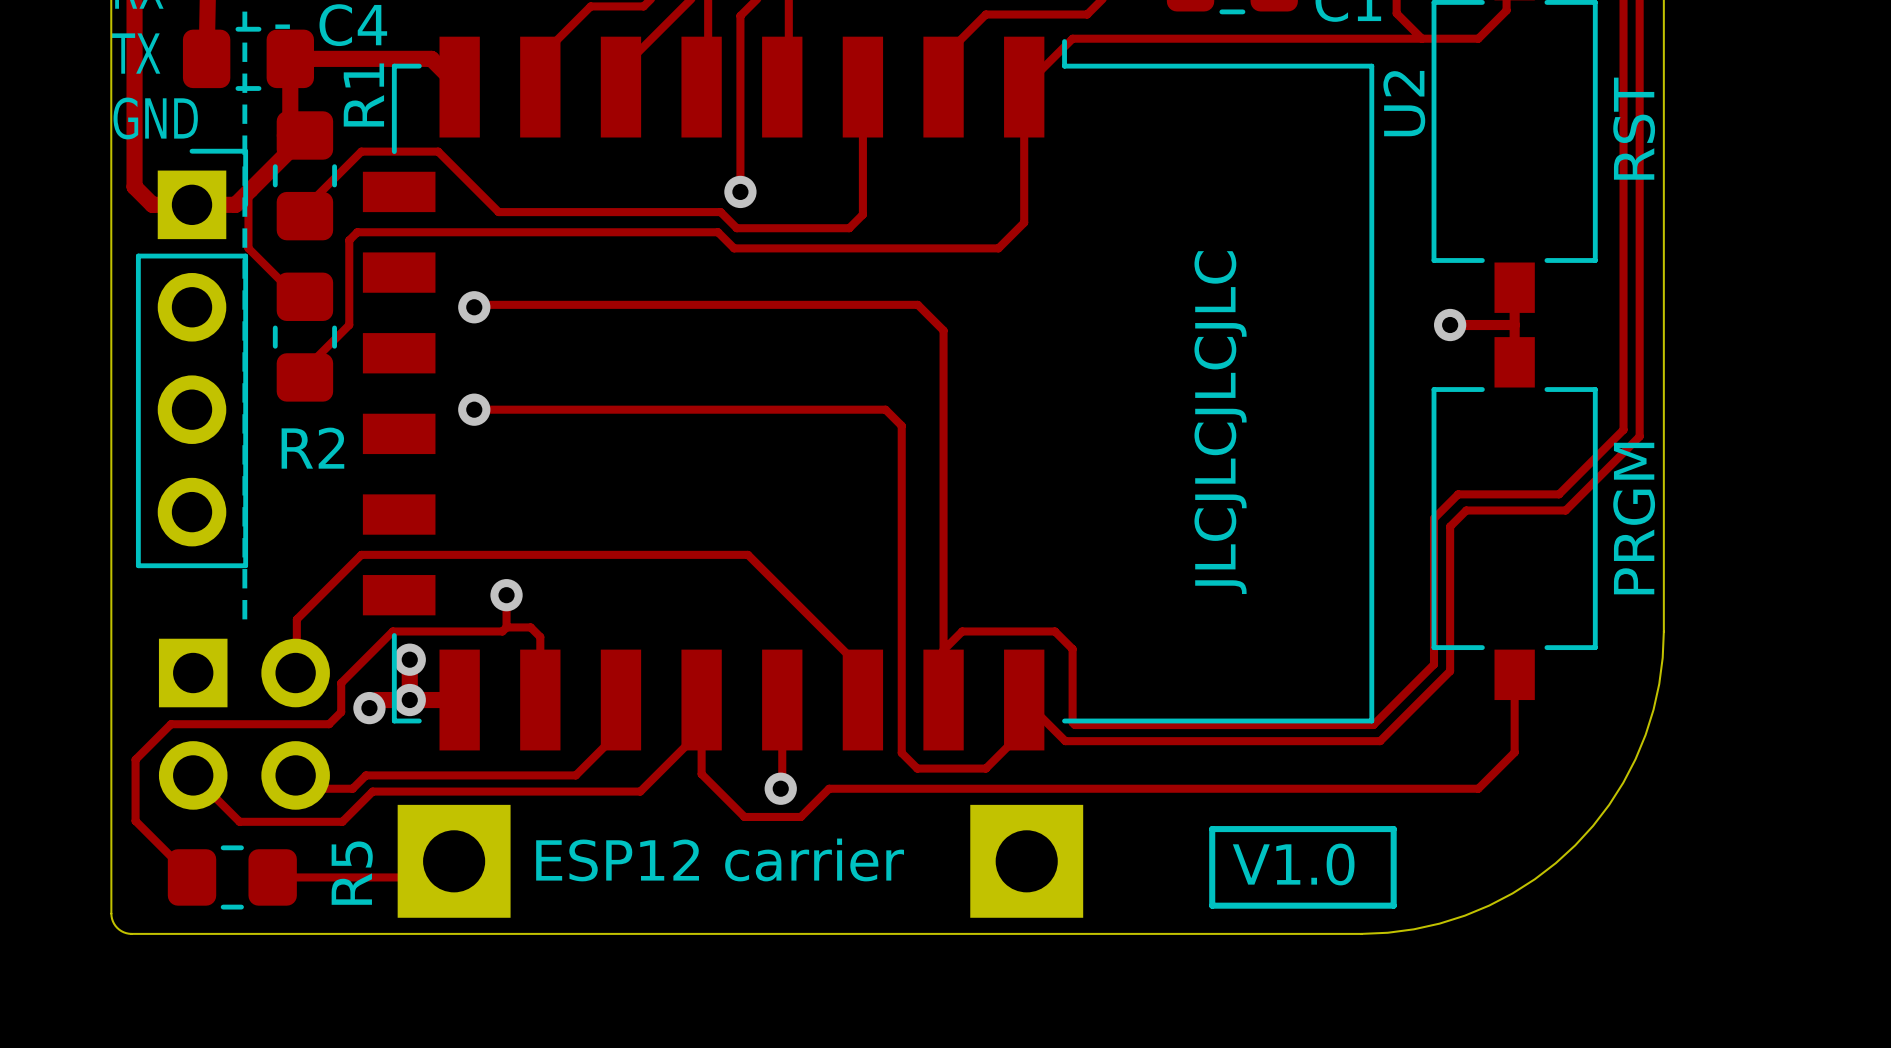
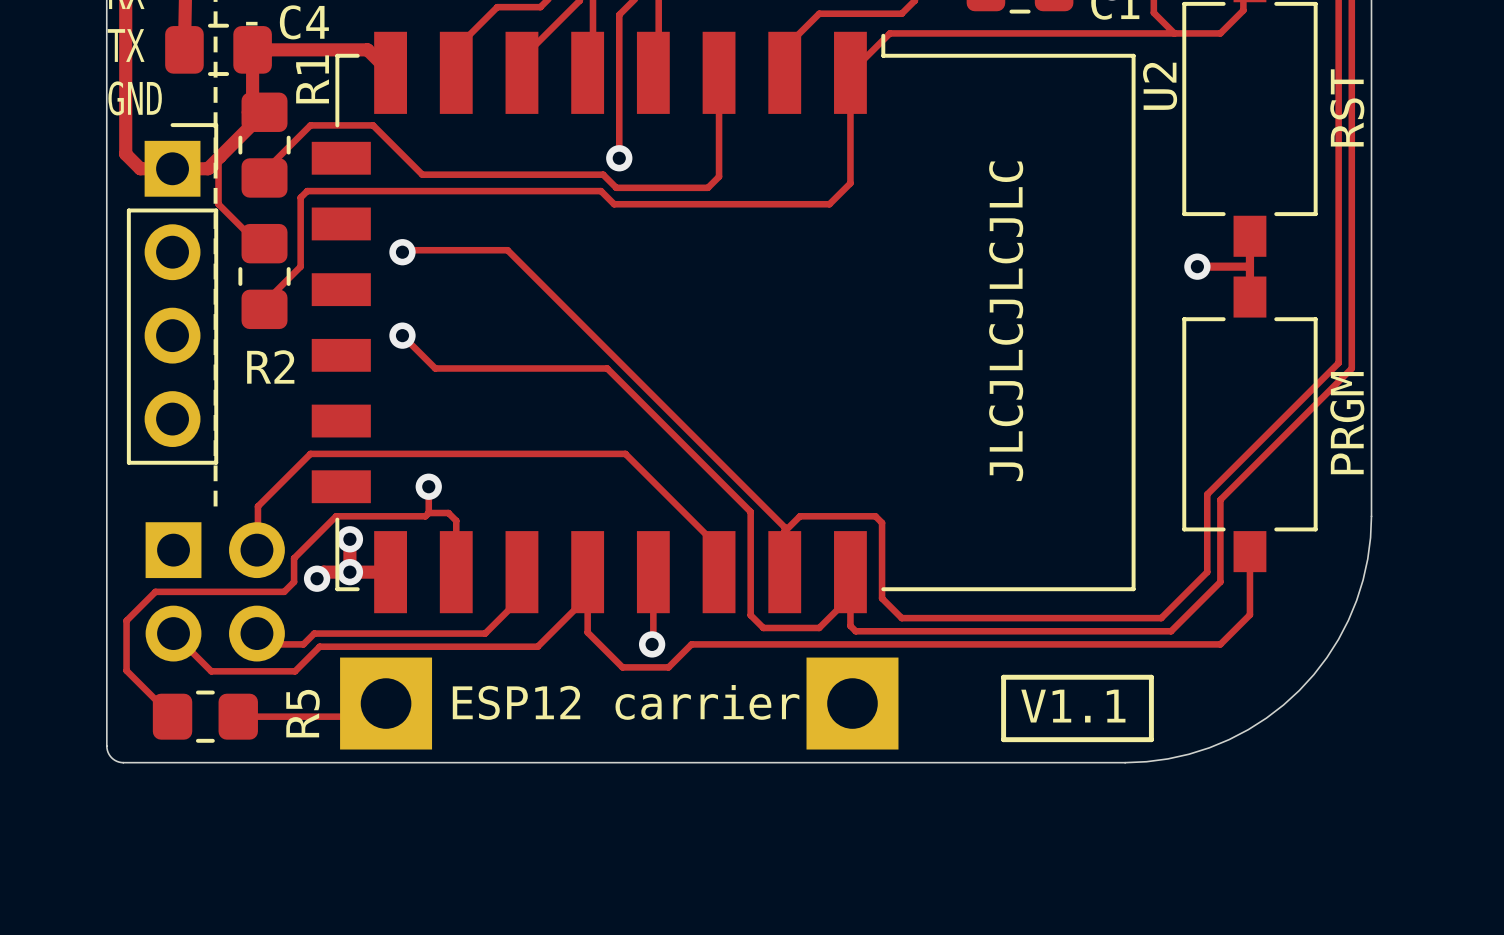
track: (603, 304) (917, 304) (943, 330) (943, 645) -> (507, 250) (784, 527)
track: (474, 409) (885, 409) (901, 425) (901, 626) -> (402, 335) (435, 368) (607, 368) (750, 511)
track: (1623, 429) (1559, 494) (1458, 494) (1434, 518) (1434, 664) (1373, 725) (1074, 725) (1072, 722) (1072, 649) (1063, 639) -> (1338, 352) (1338, 363) (1207, 494) (1207, 572) (1161, 618) (901, 618) (882, 598) (882, 522)
track: (1639, 436) (1565, 510) (1466, 510) (1450, 526) (1450, 671) (1380, 741) (1065, 741) (1024, 700) -> (1351, 357) (1351, 368) (1220, 499) (1220, 582) (1171, 631) (855, 631) (850, 625) (850, 596)
text: V1.0 (1293, 864) -> V1.1 (1073, 706)

